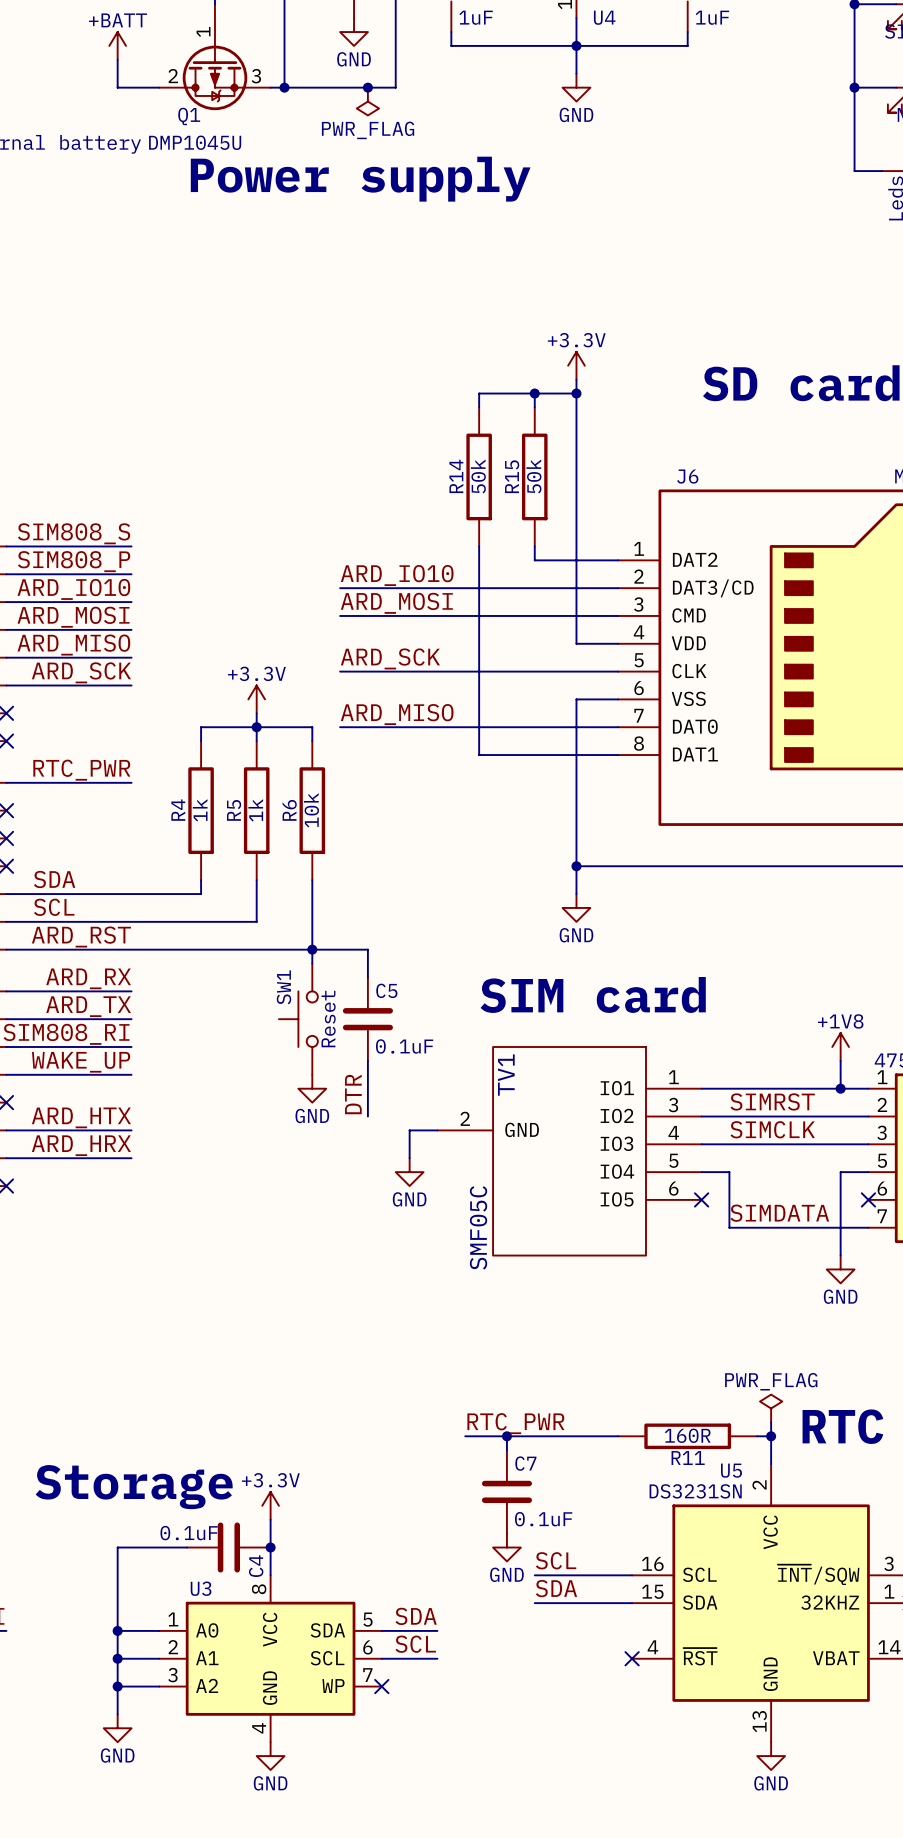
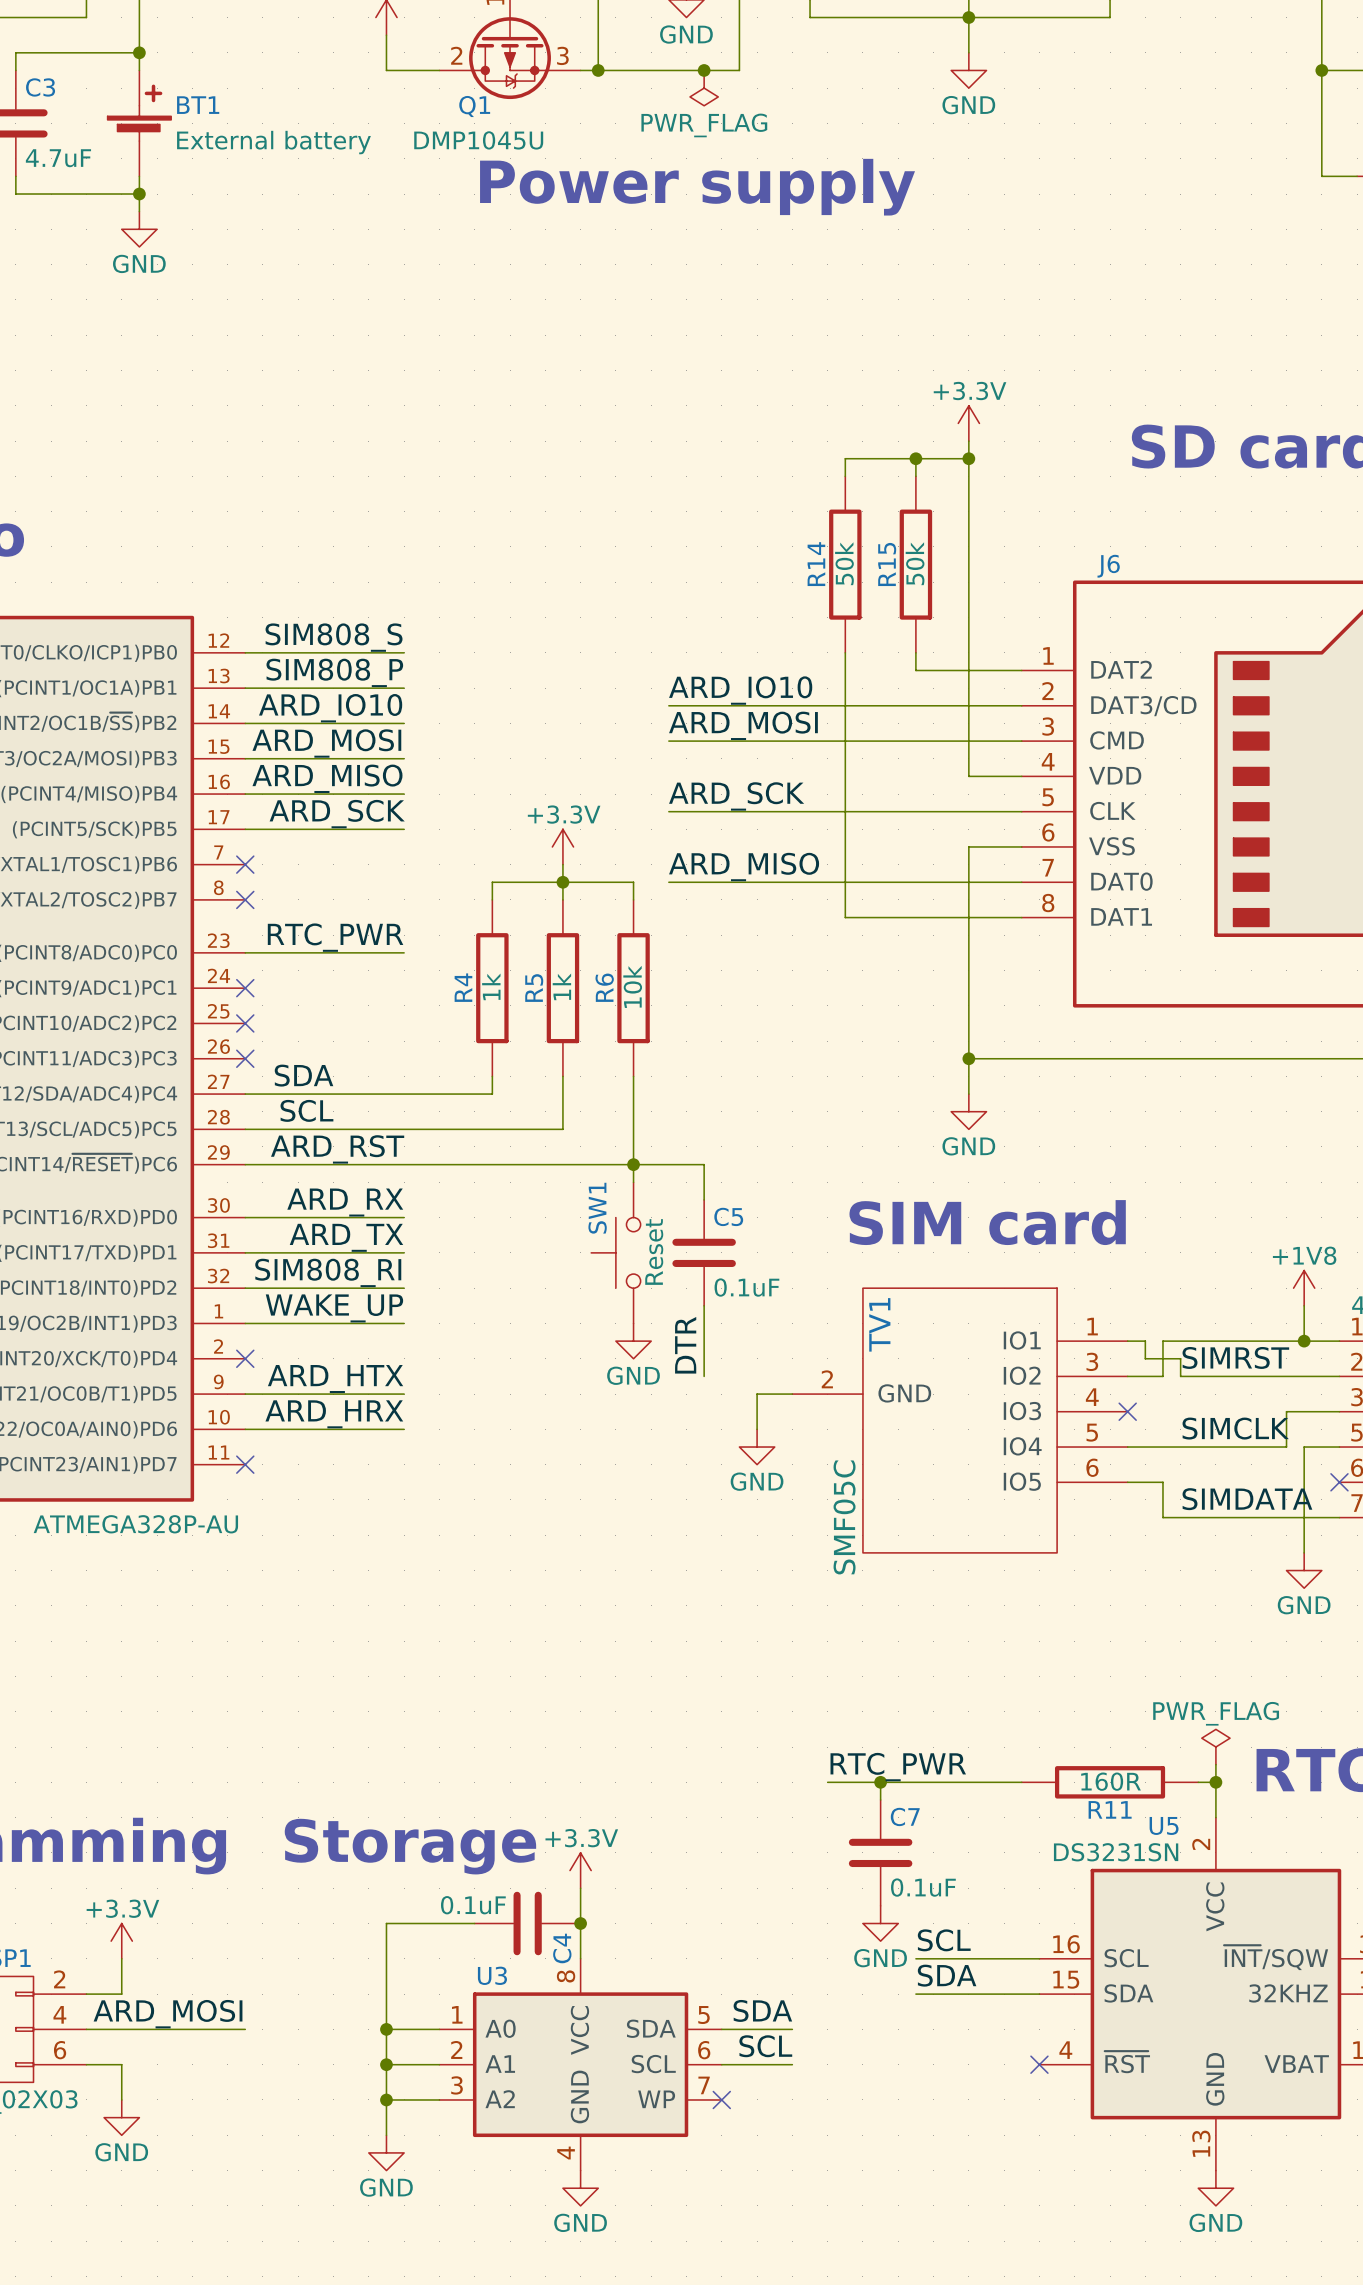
wire: (715, 1088) (729, 1088) -> (1162, 1376) (1162, 1341)
label position: SIMRST (772, 1101) -> SIMRST (1235, 1357)
wire: (729, 1116) (743, 1116) -> (1145, 1341) (1145, 1358) (1180, 1358) (1180, 1376)
label position: SIMCLK (772, 1129) -> SIMCLK (1235, 1428)
wire: (701, 1144) (826, 1144) -> (1162, 1447) (1286, 1447) (1286, 1411)
wire: (729, 1172) (729, 1199) -> (1127, 1482) (1162, 1482)
no-connect mark position: (701, 1199) -> (1127, 1411)
label position: SIMDATA (779, 1213) -> SIMDATA (1247, 1499)

